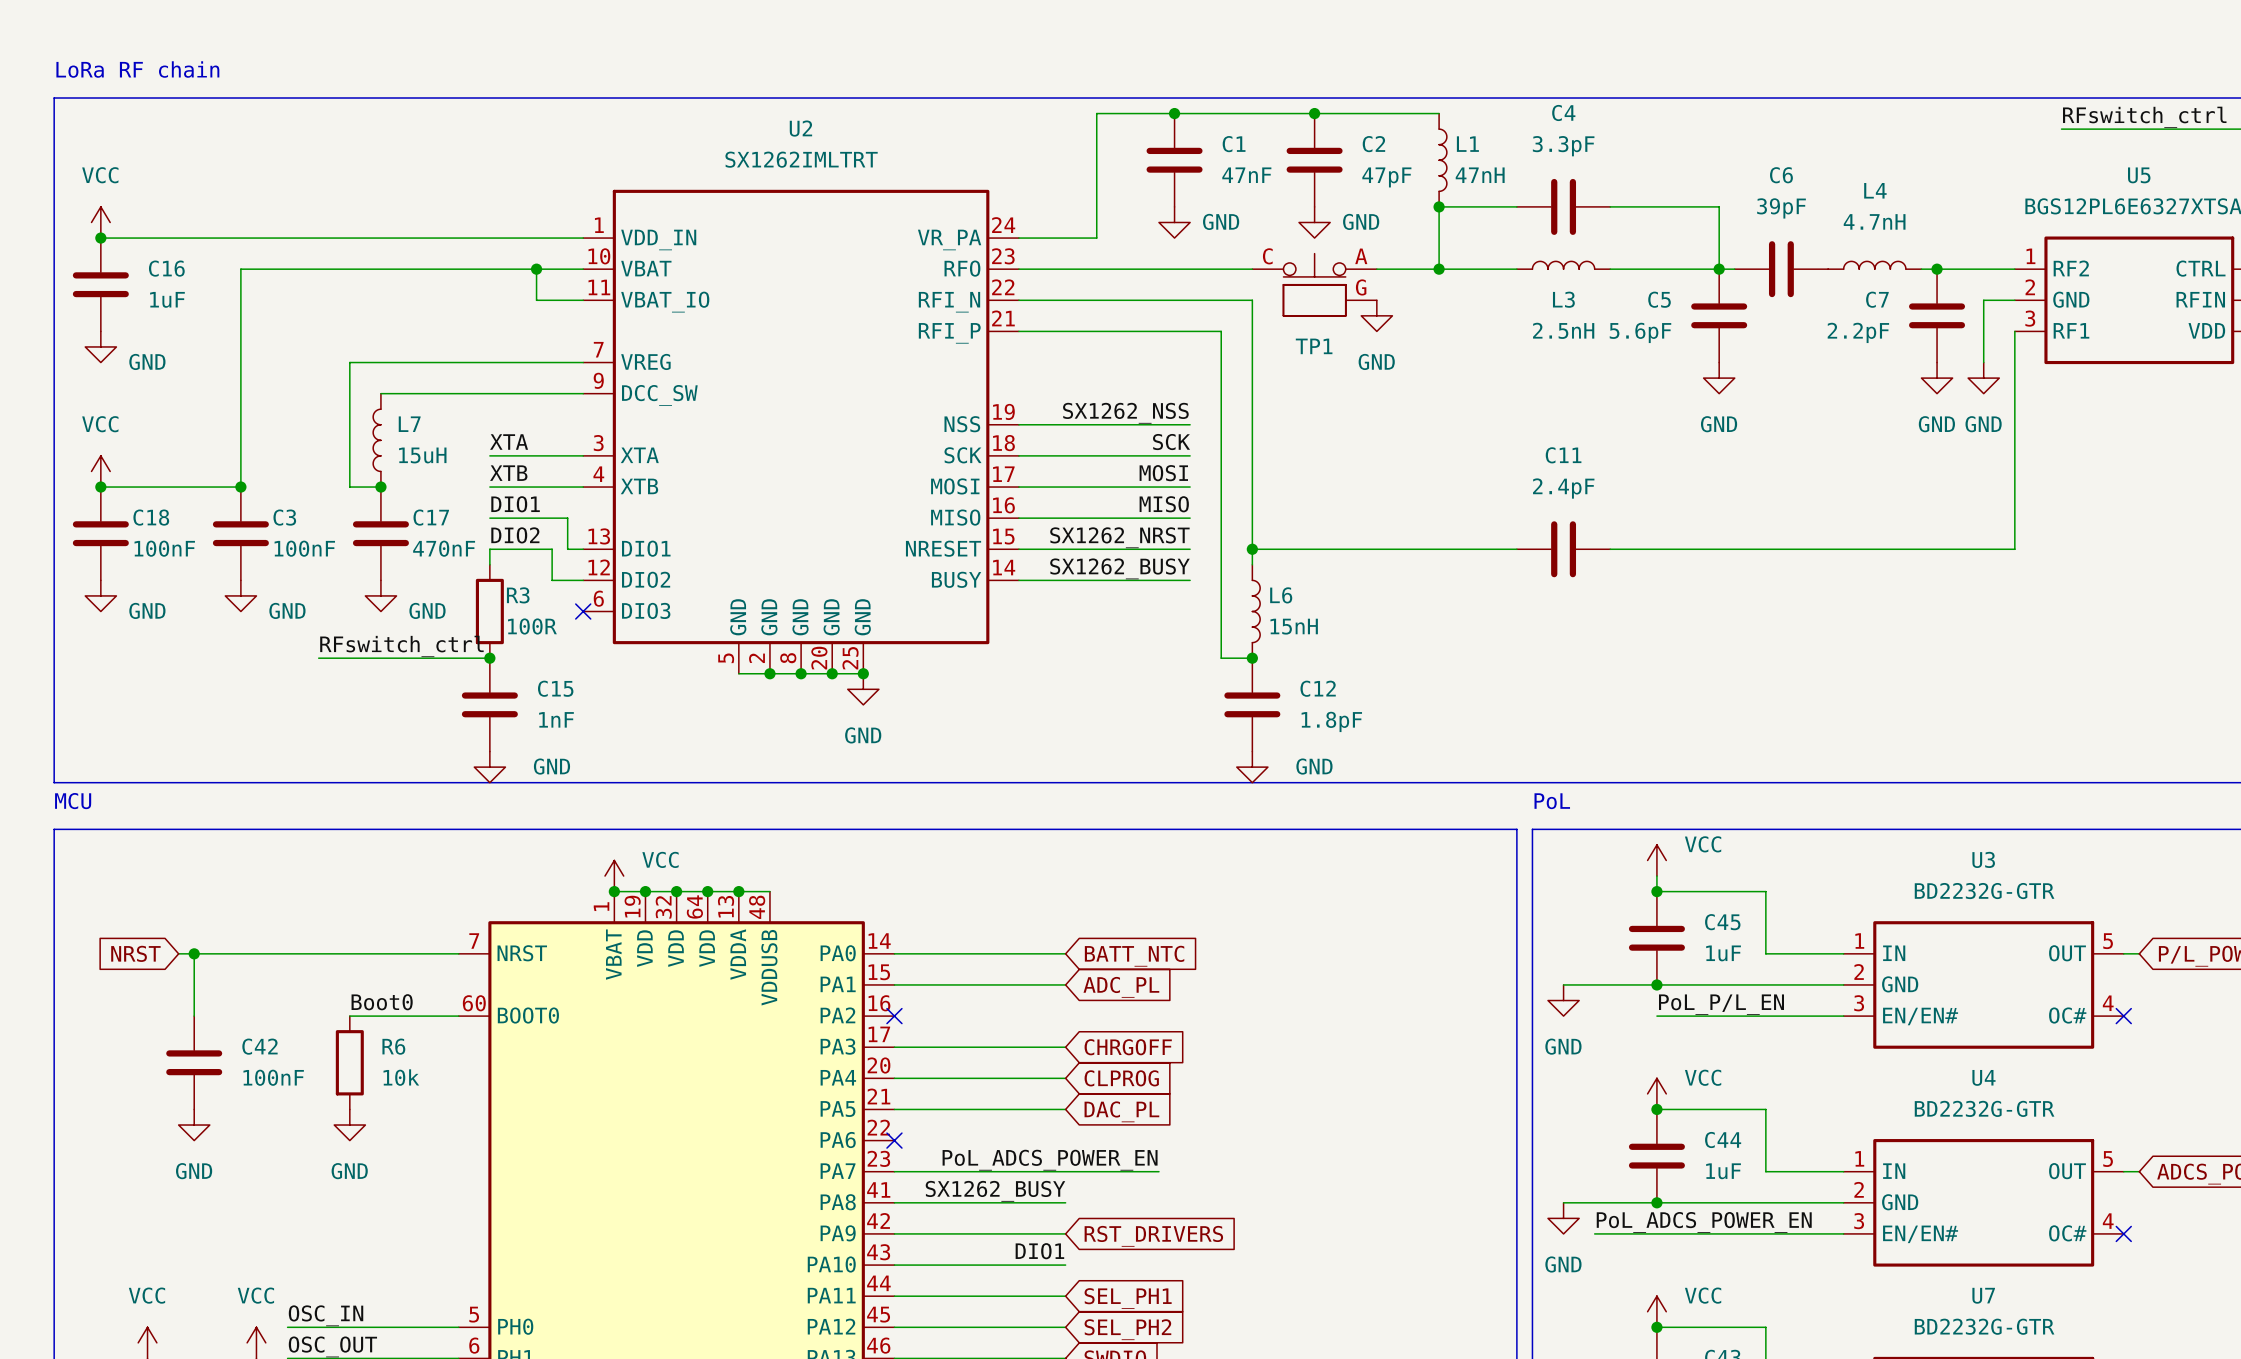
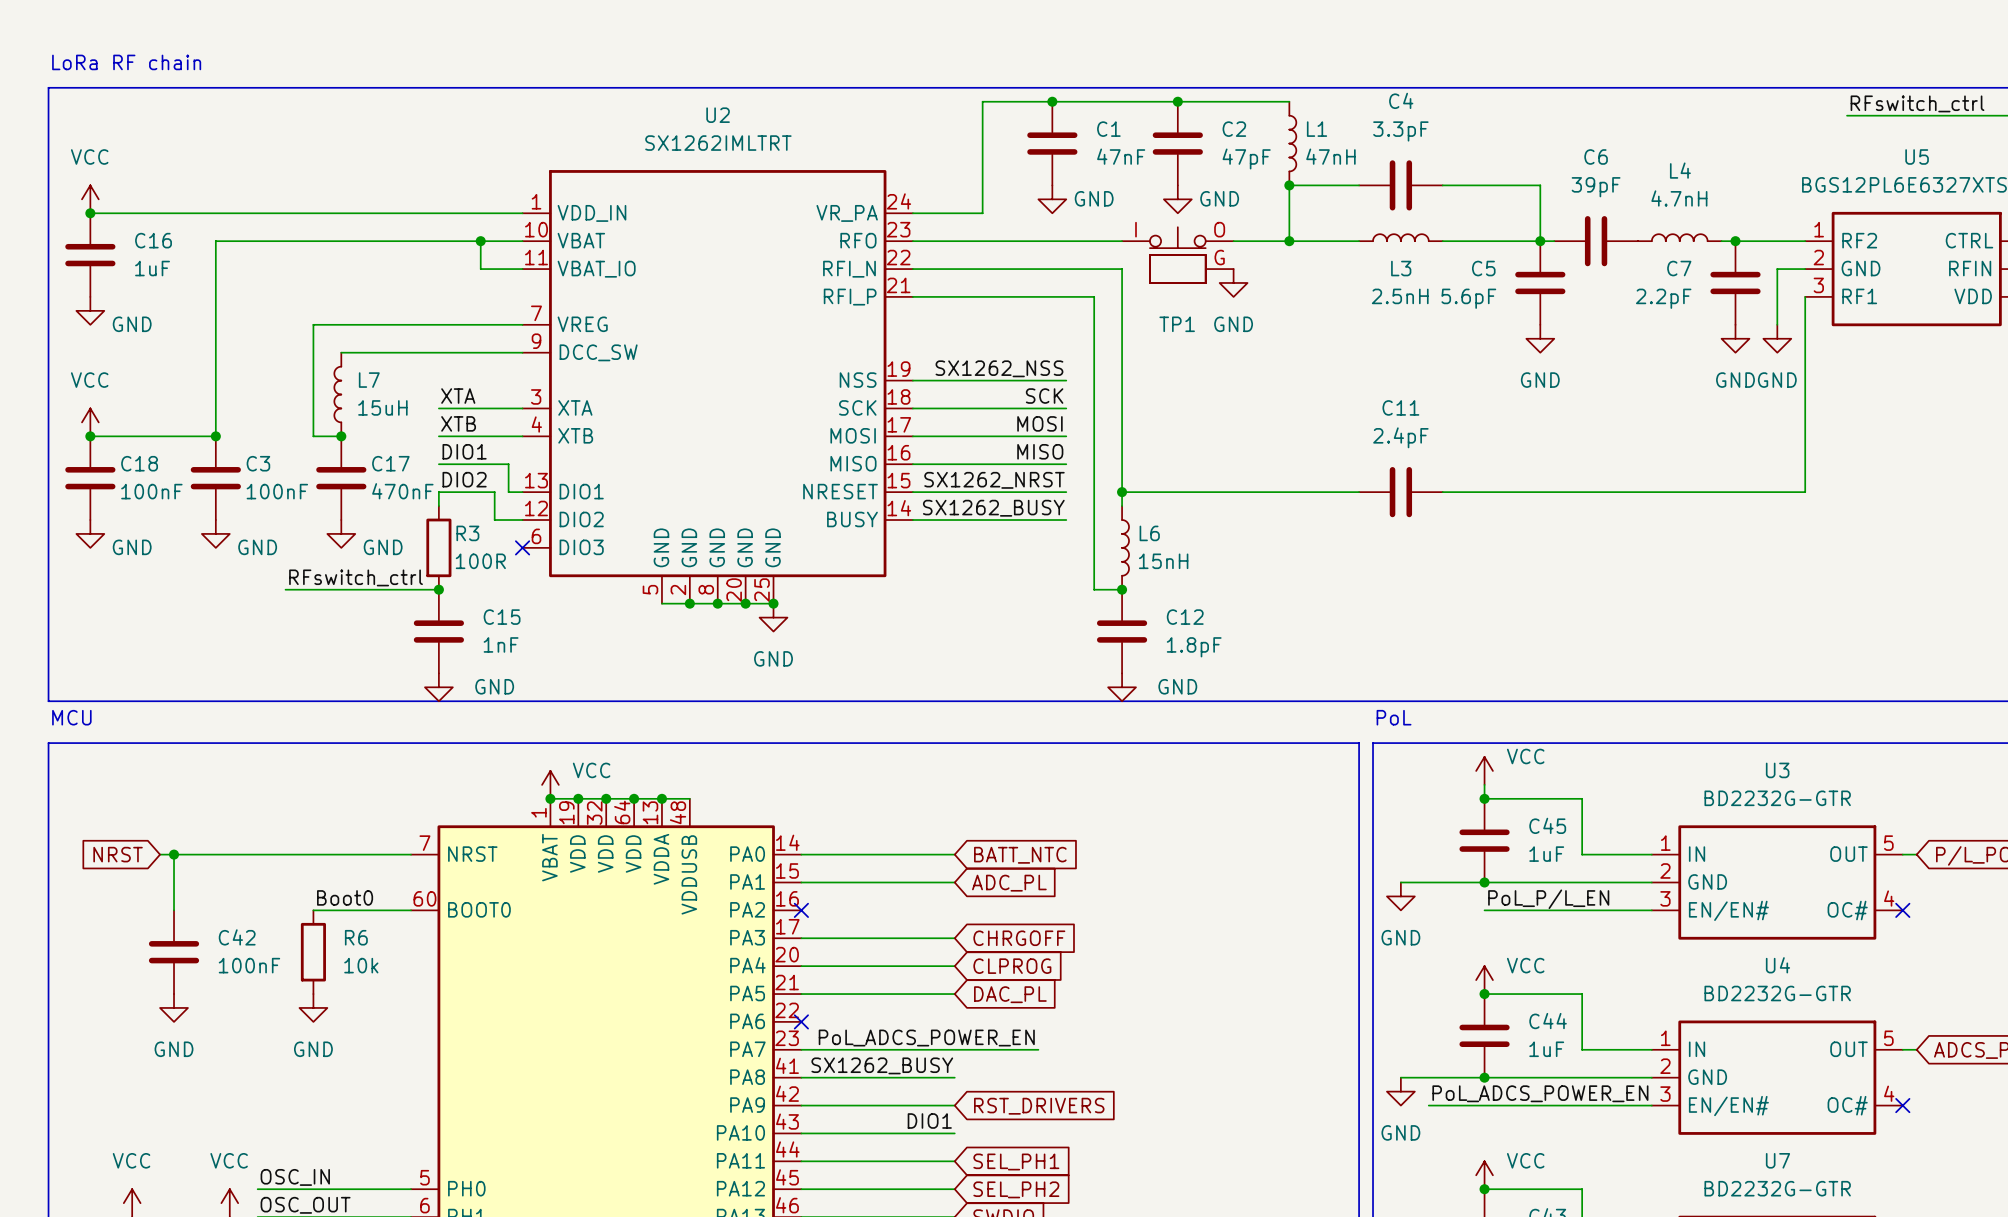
TP1 pin number: C (1267, 256) -> I (1136, 229)
TP1 pin number: A (1361, 256) -> O (1219, 229)
TP1 name position: TP1 (1314, 346) -> TP1 (1177, 324)

